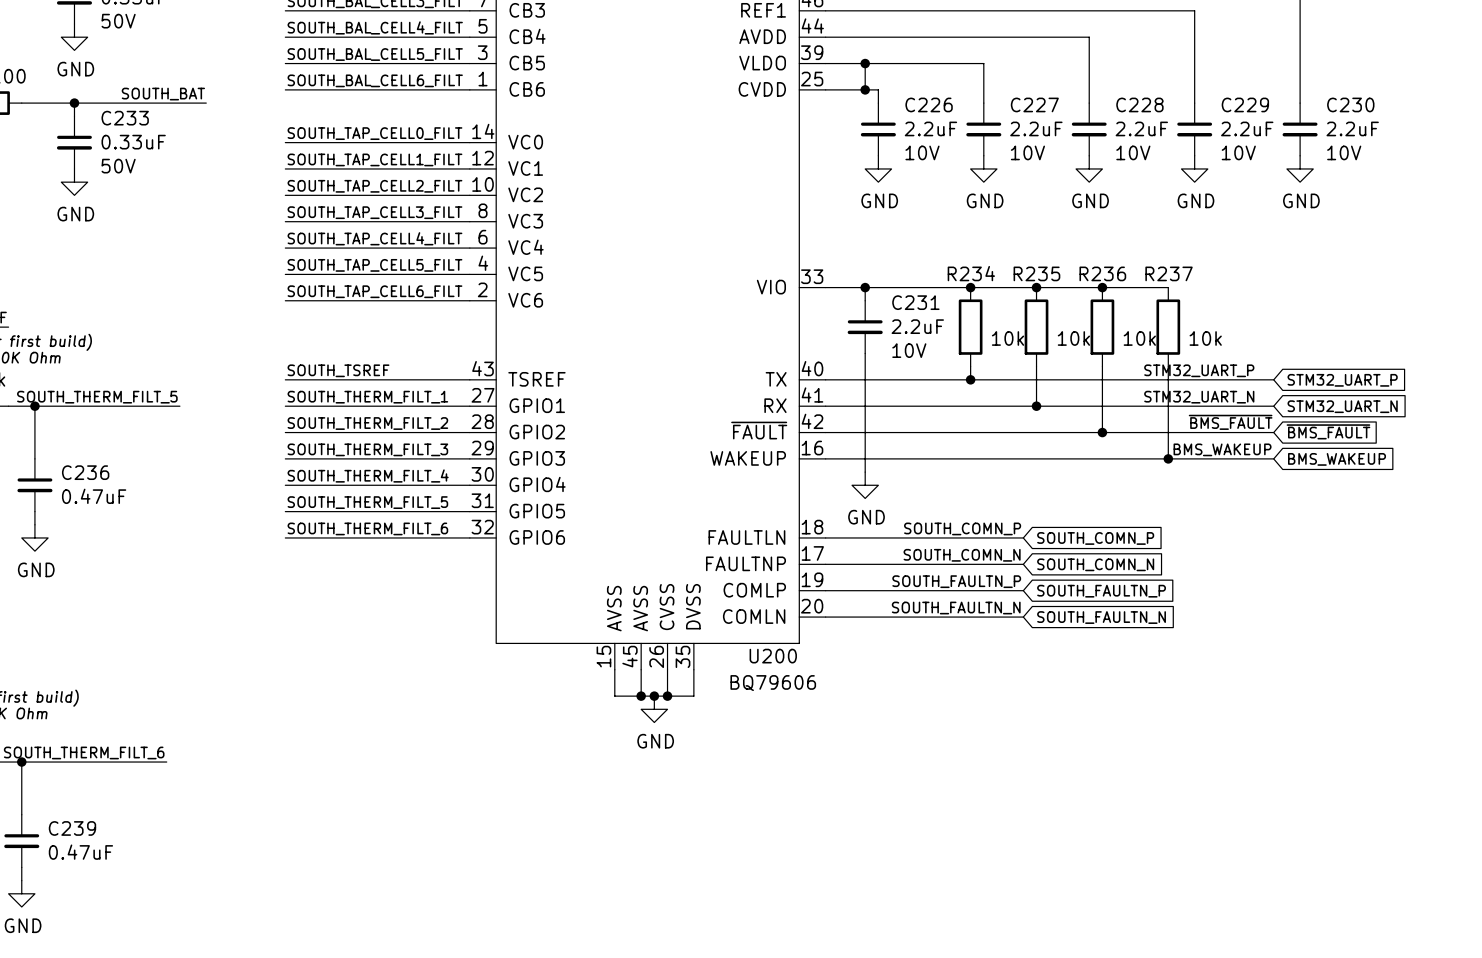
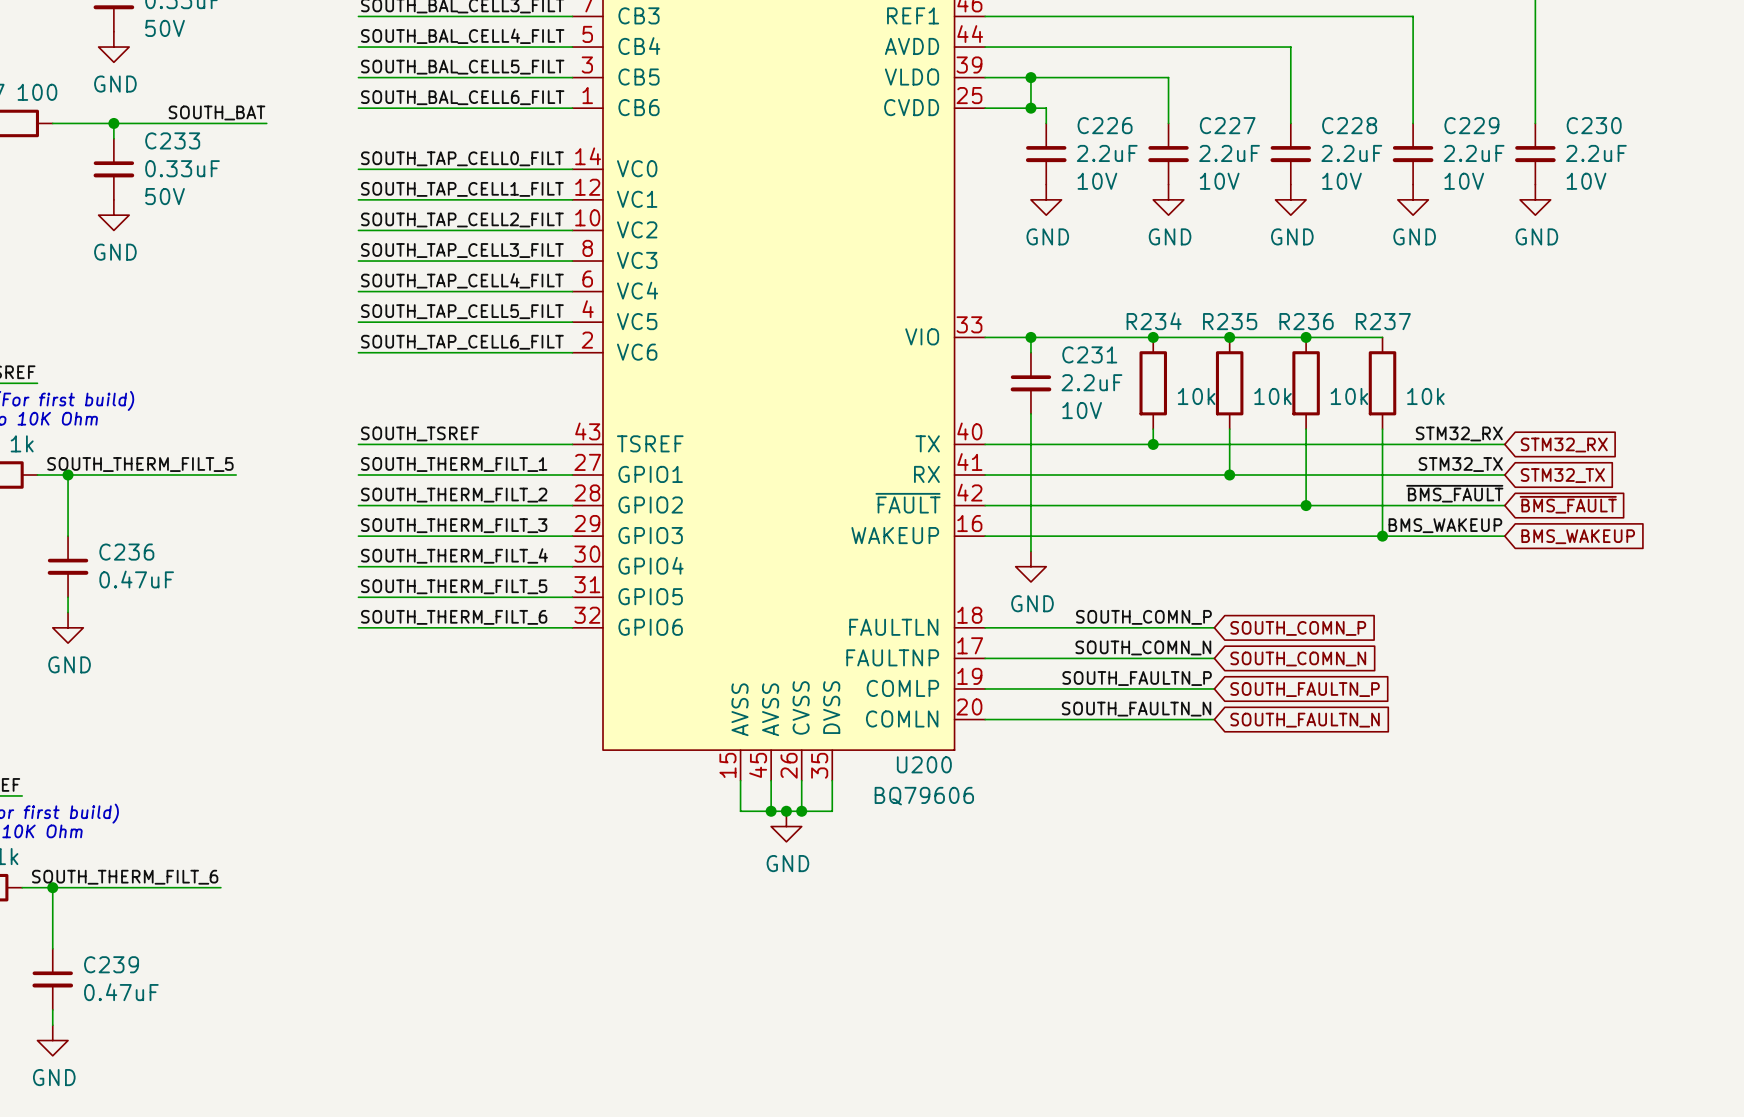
label: STM32_UART_P (1199, 370) -> STM32_RX (1459, 433)
global label: STM32_UART_P (1342, 380) -> STM32_RX (1564, 444)
label: STM32_UART_N (1199, 397) -> STM32_TX (1460, 464)
global label: STM32_UART_N (1342, 406) -> STM32_TX (1562, 475)

